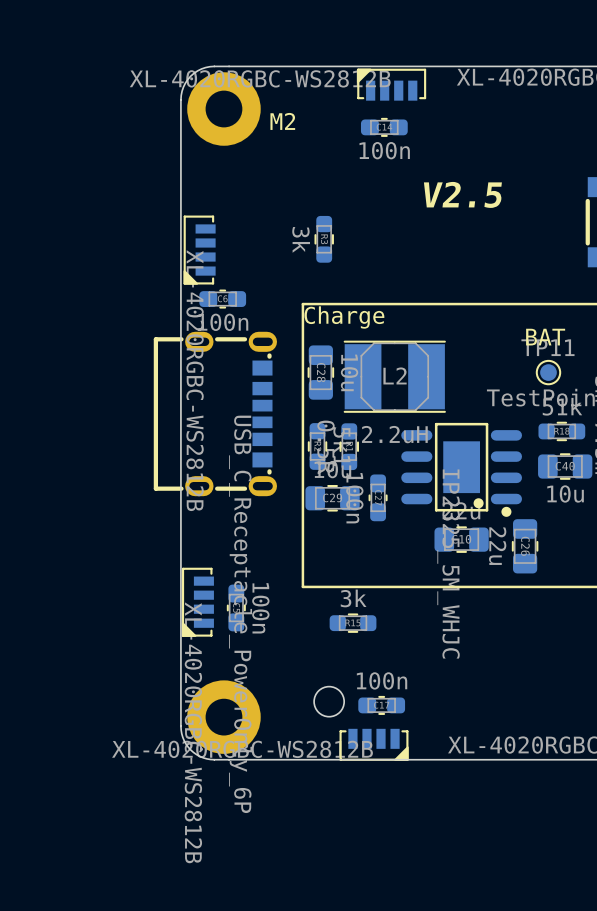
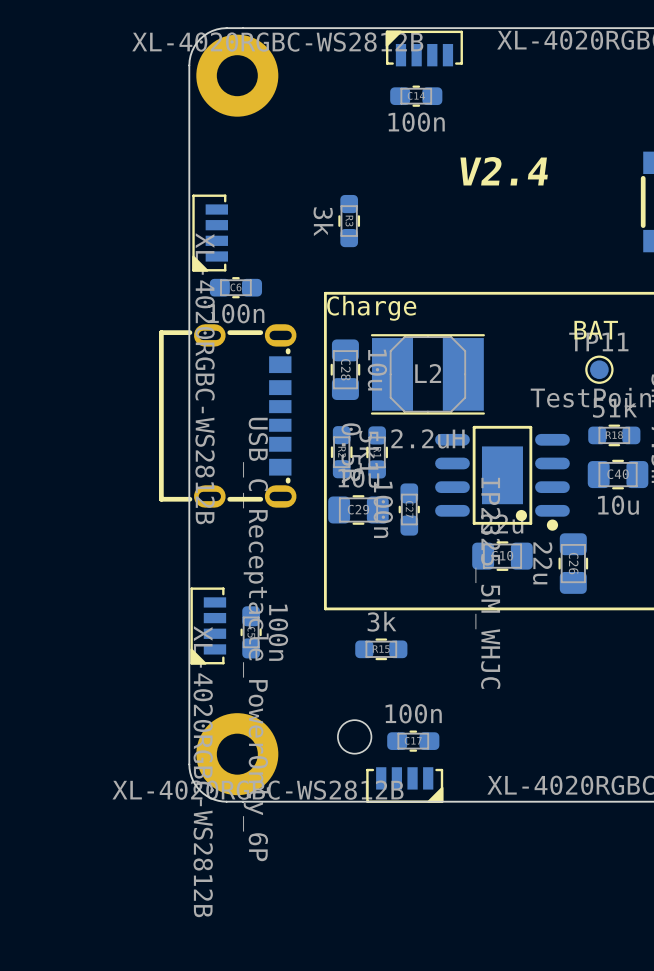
text: M2 (282, 121) -> none
text: V2.5 (462, 194) -> V2.4 (504, 171)

